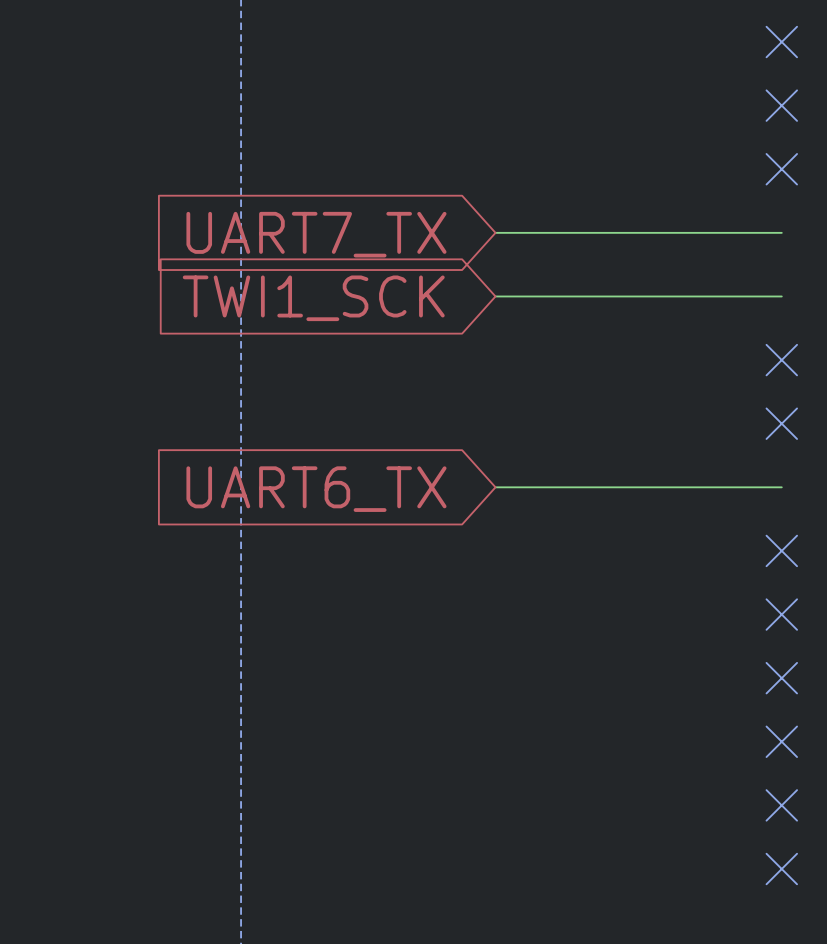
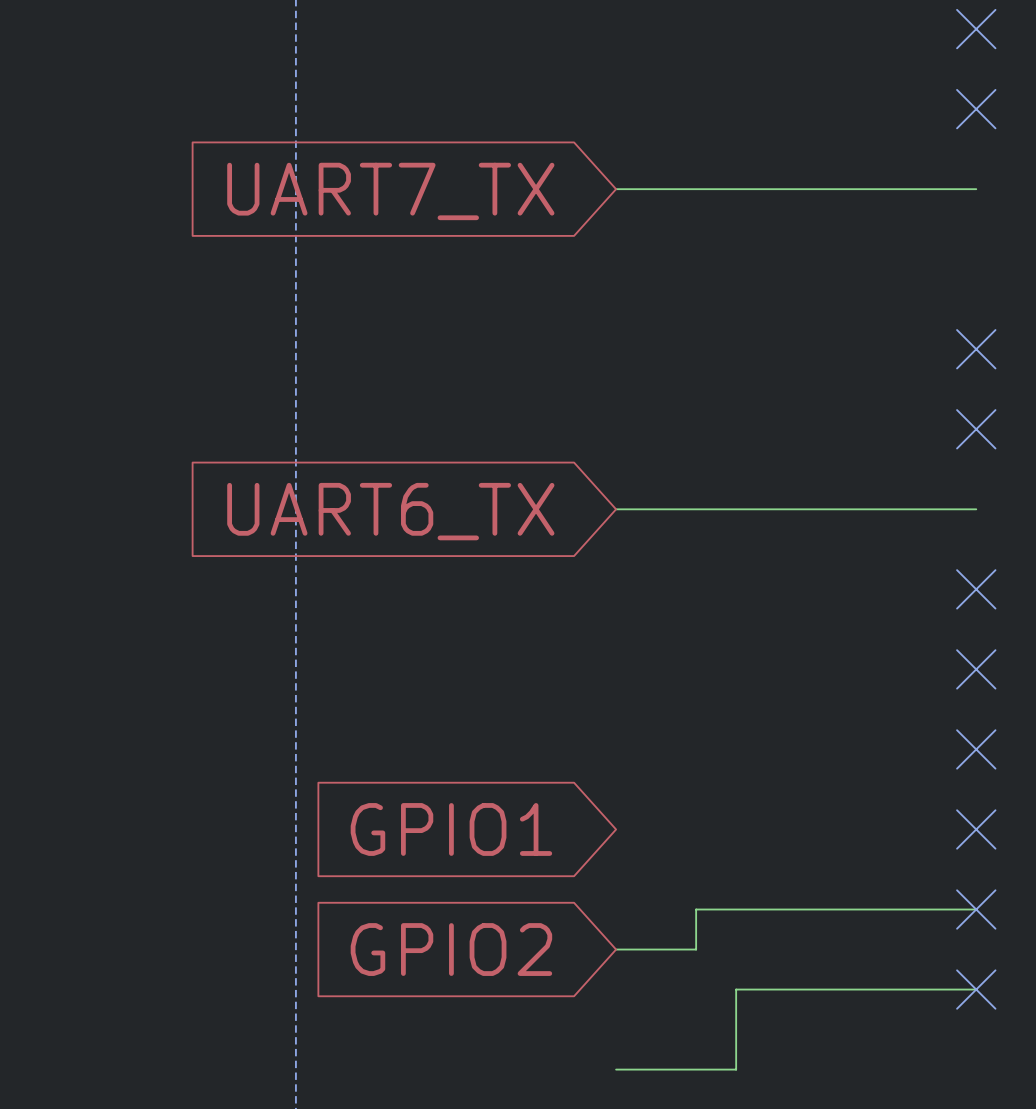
wire: (495, 296) (781, 296) -> none
global label: TWI1_SCK (313, 298) -> none
global label: none -> GPIO1 (451, 829)
wire: none -> (976, 909) (696, 909) (696, 949) (616, 949)
global label: none -> GPIO2 (451, 949)
wire: none -> (976, 989) (736, 989) (736, 1069) (616, 1069)

